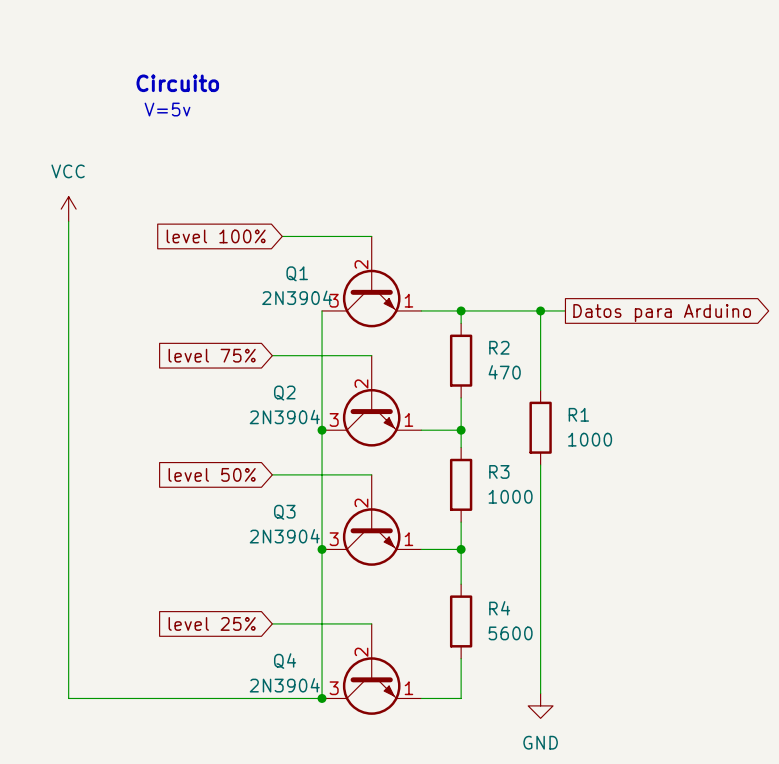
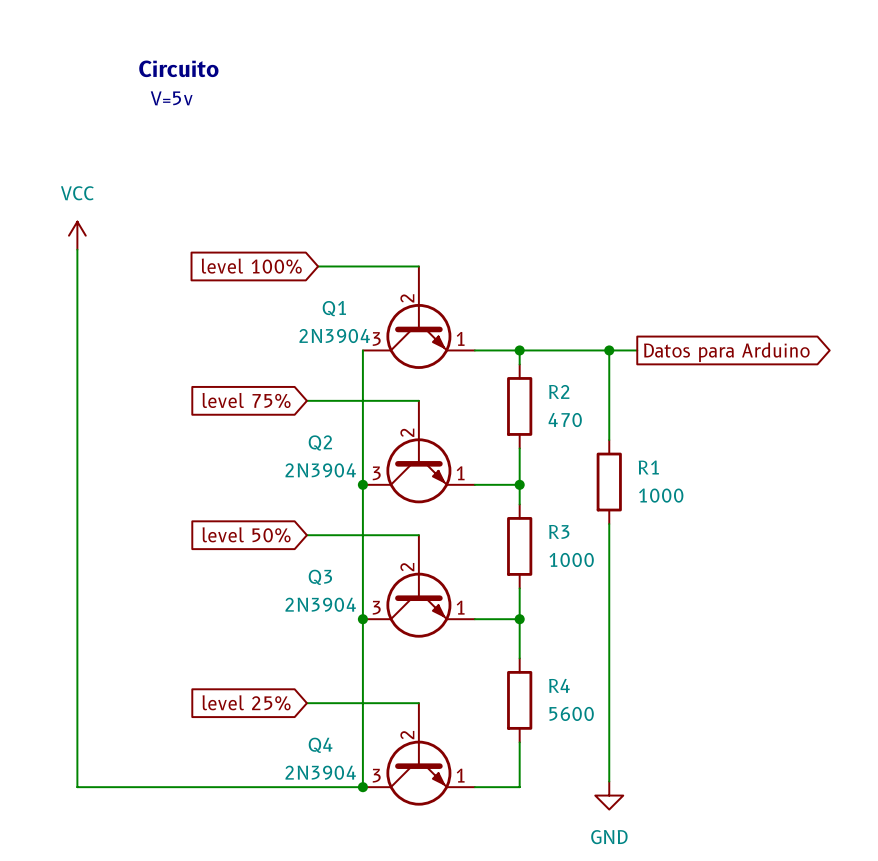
text: none -> Circuito (178, 68)
text: Circuito (177, 83) -> V=5v (171, 98)
text: V=5v (167, 109) -> none

